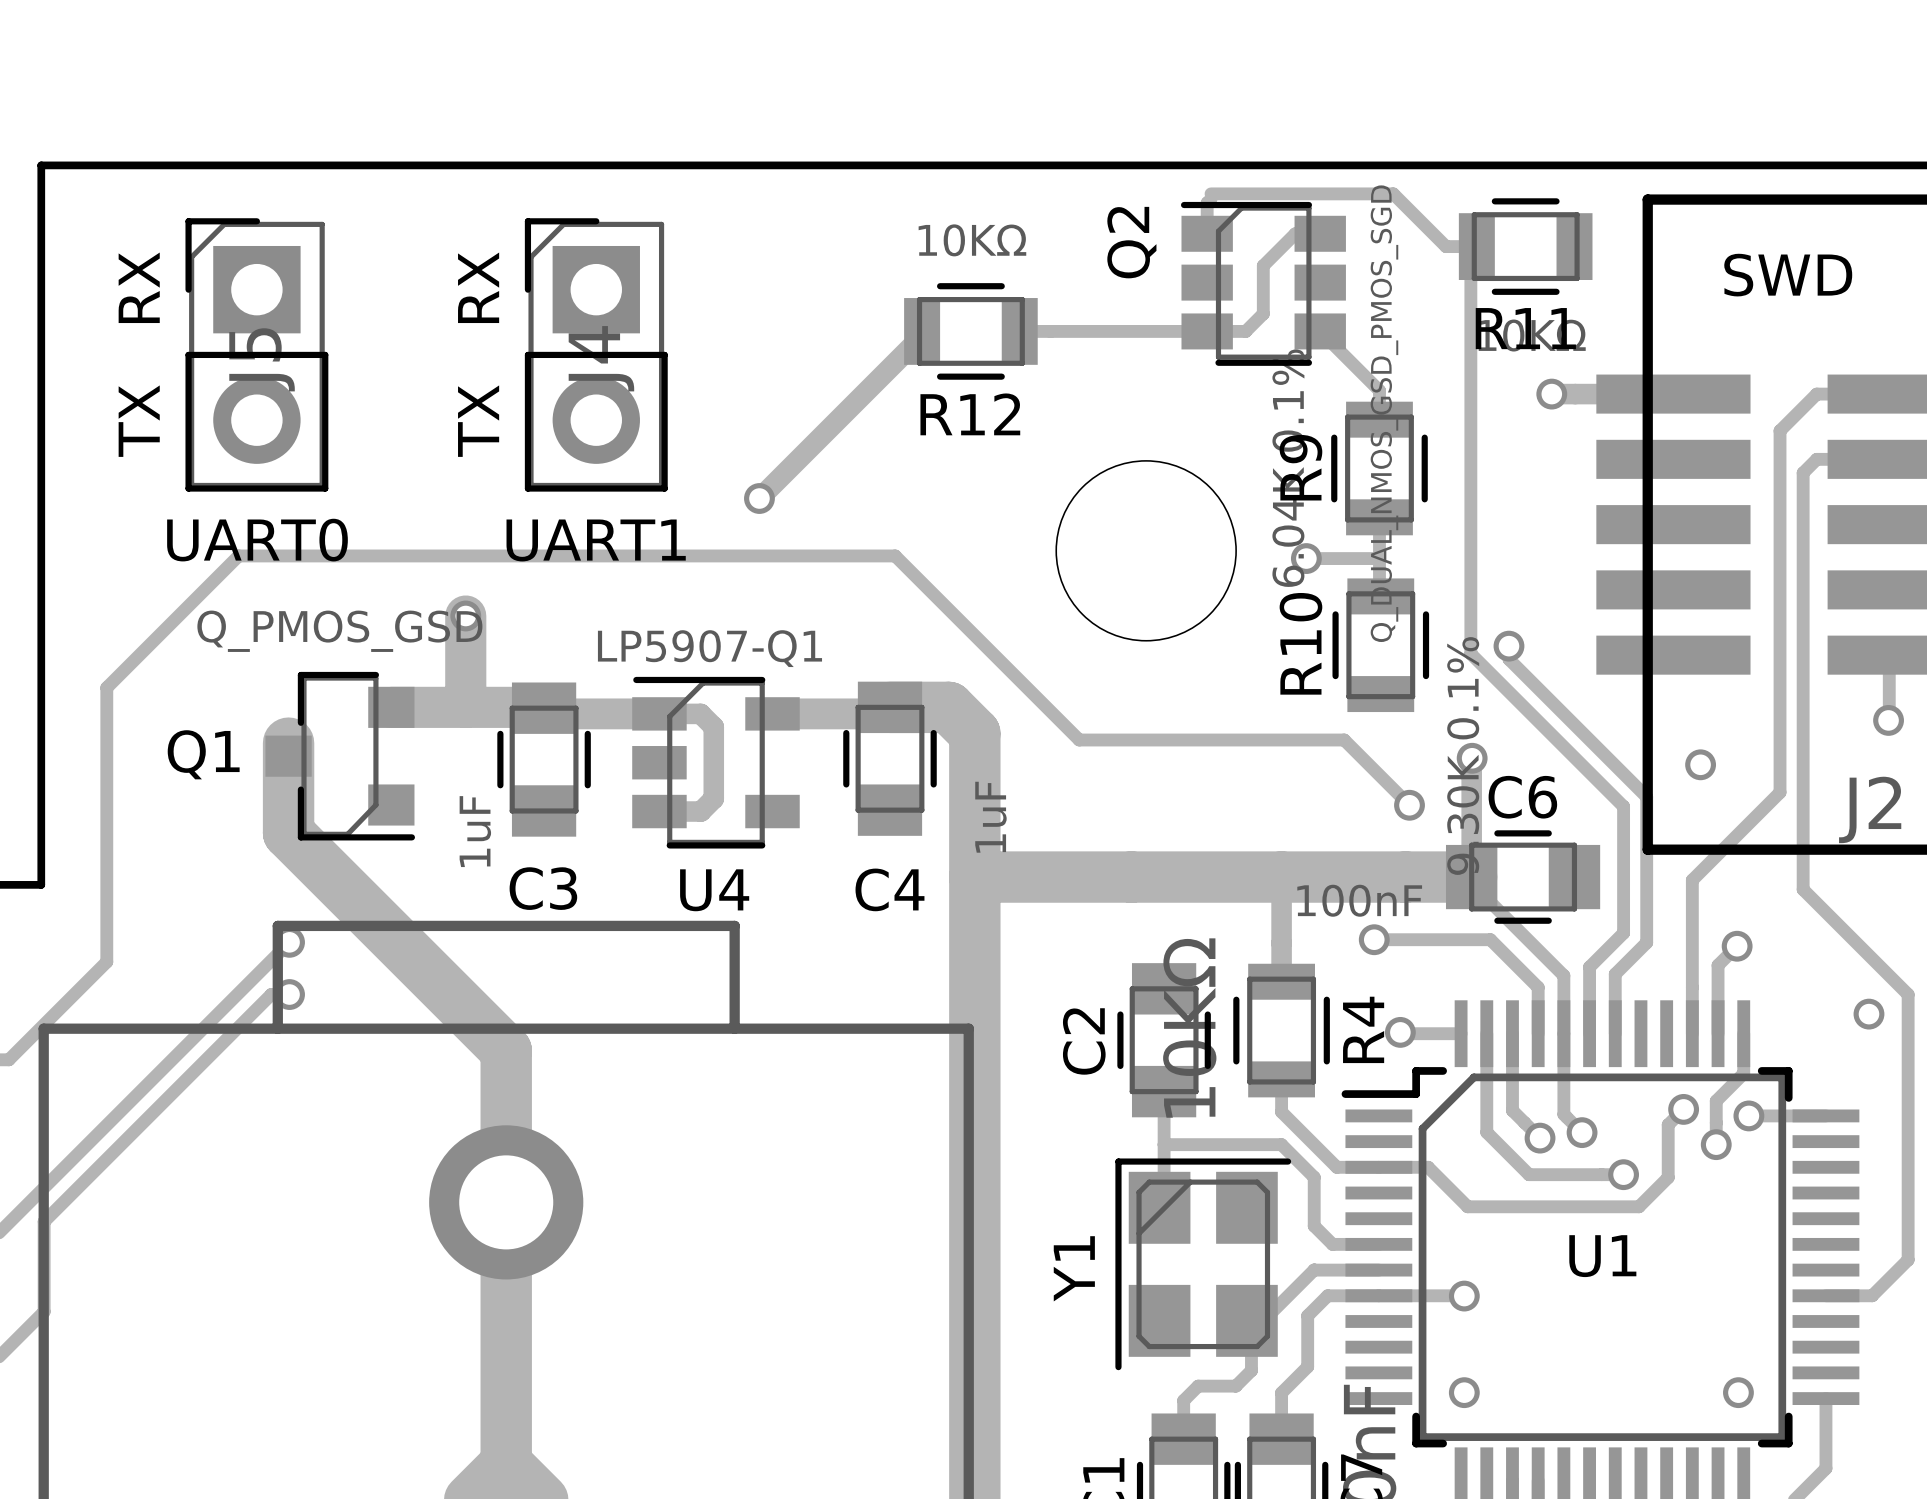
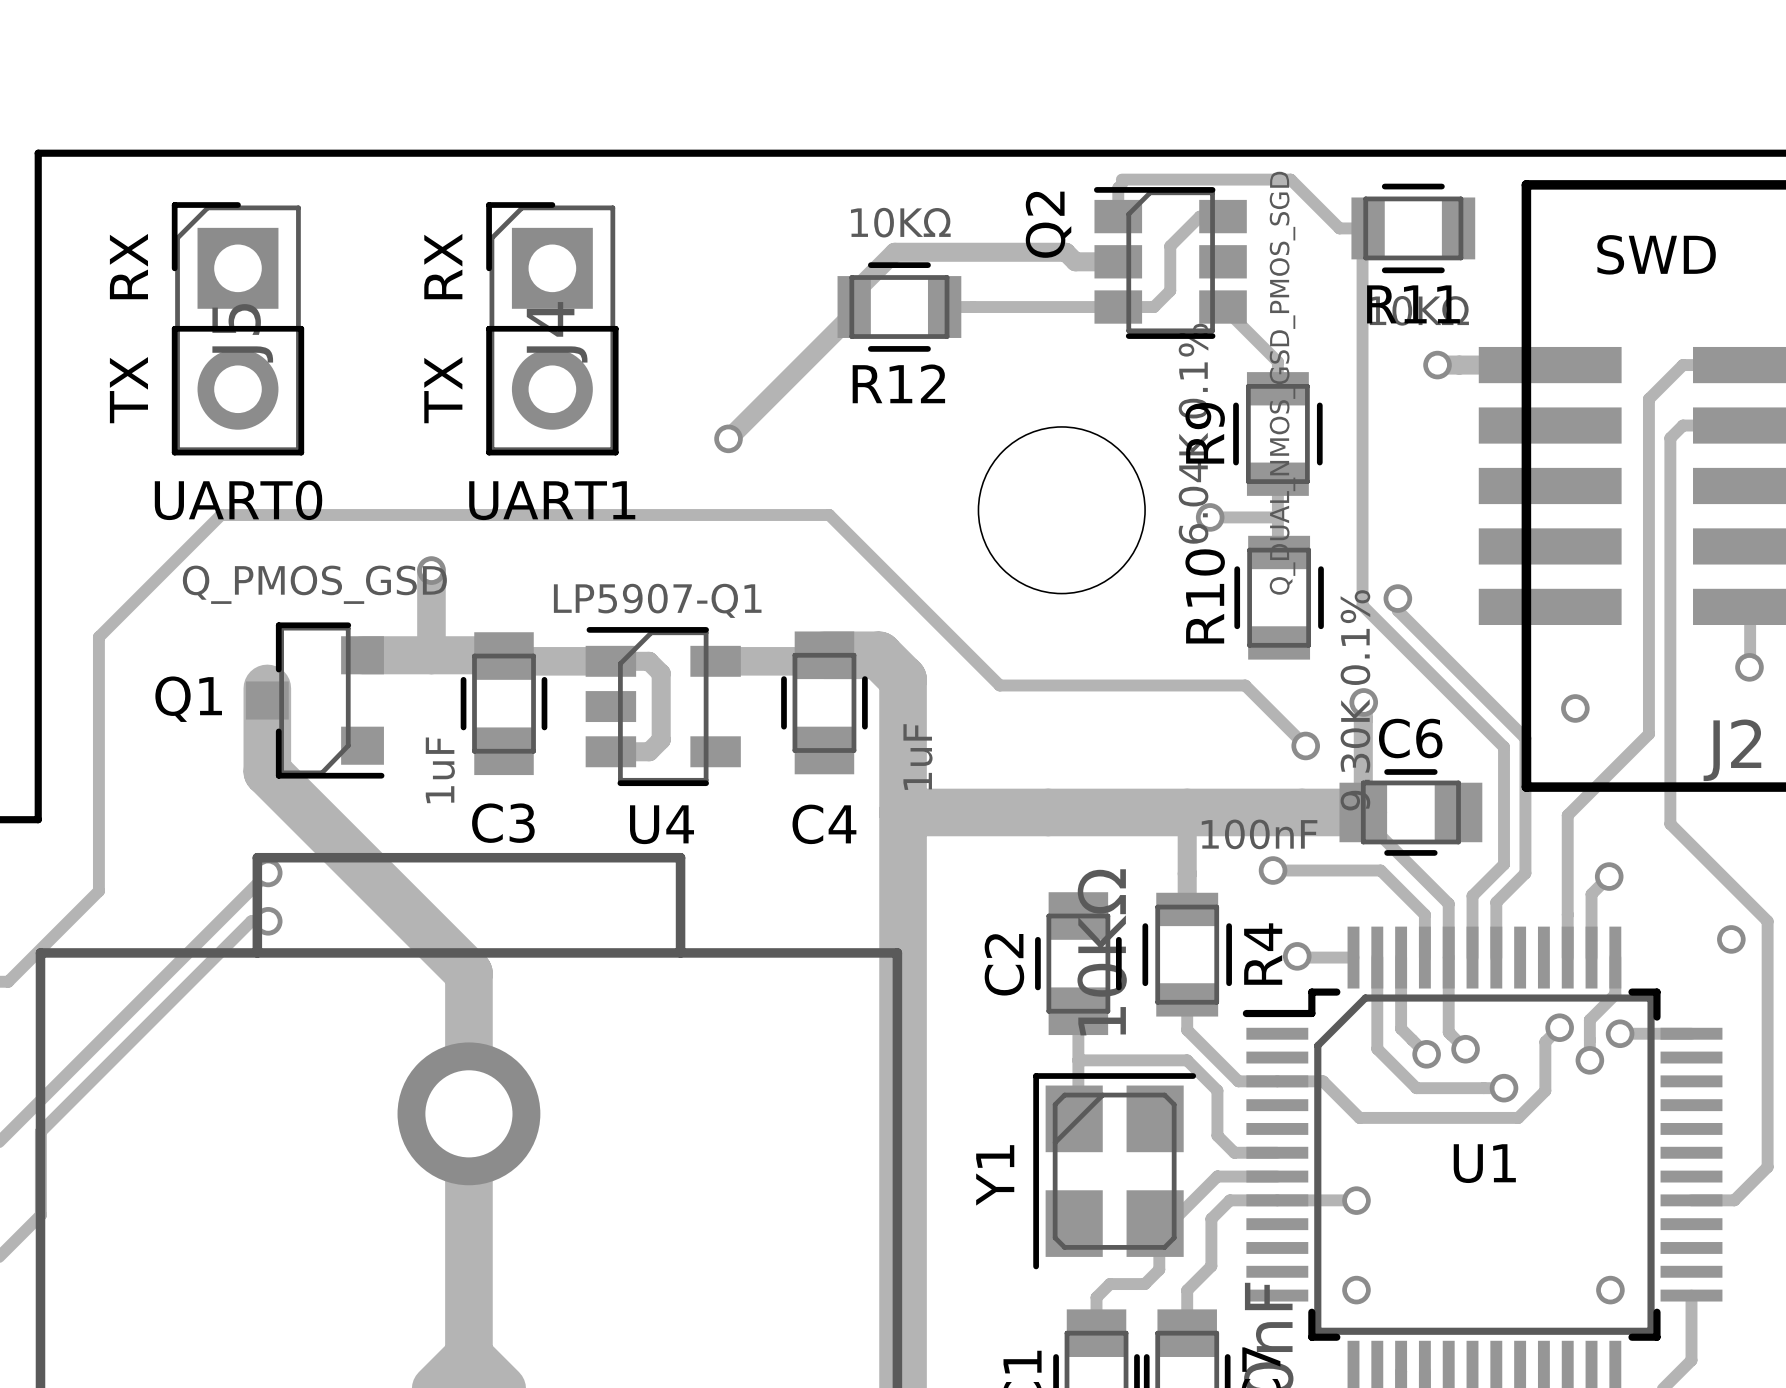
track: none -> (1118, 261) (1075, 261) (1065, 252) (894, 252) (854, 292) (854, 307)
track: (922, 335) (759, 498) -> (854, 311) (728, 438)
via position: (759, 498) -> (728, 438)
track width: thick (465, 615) (465, 707) -> thin (431, 570) (431, 655)

